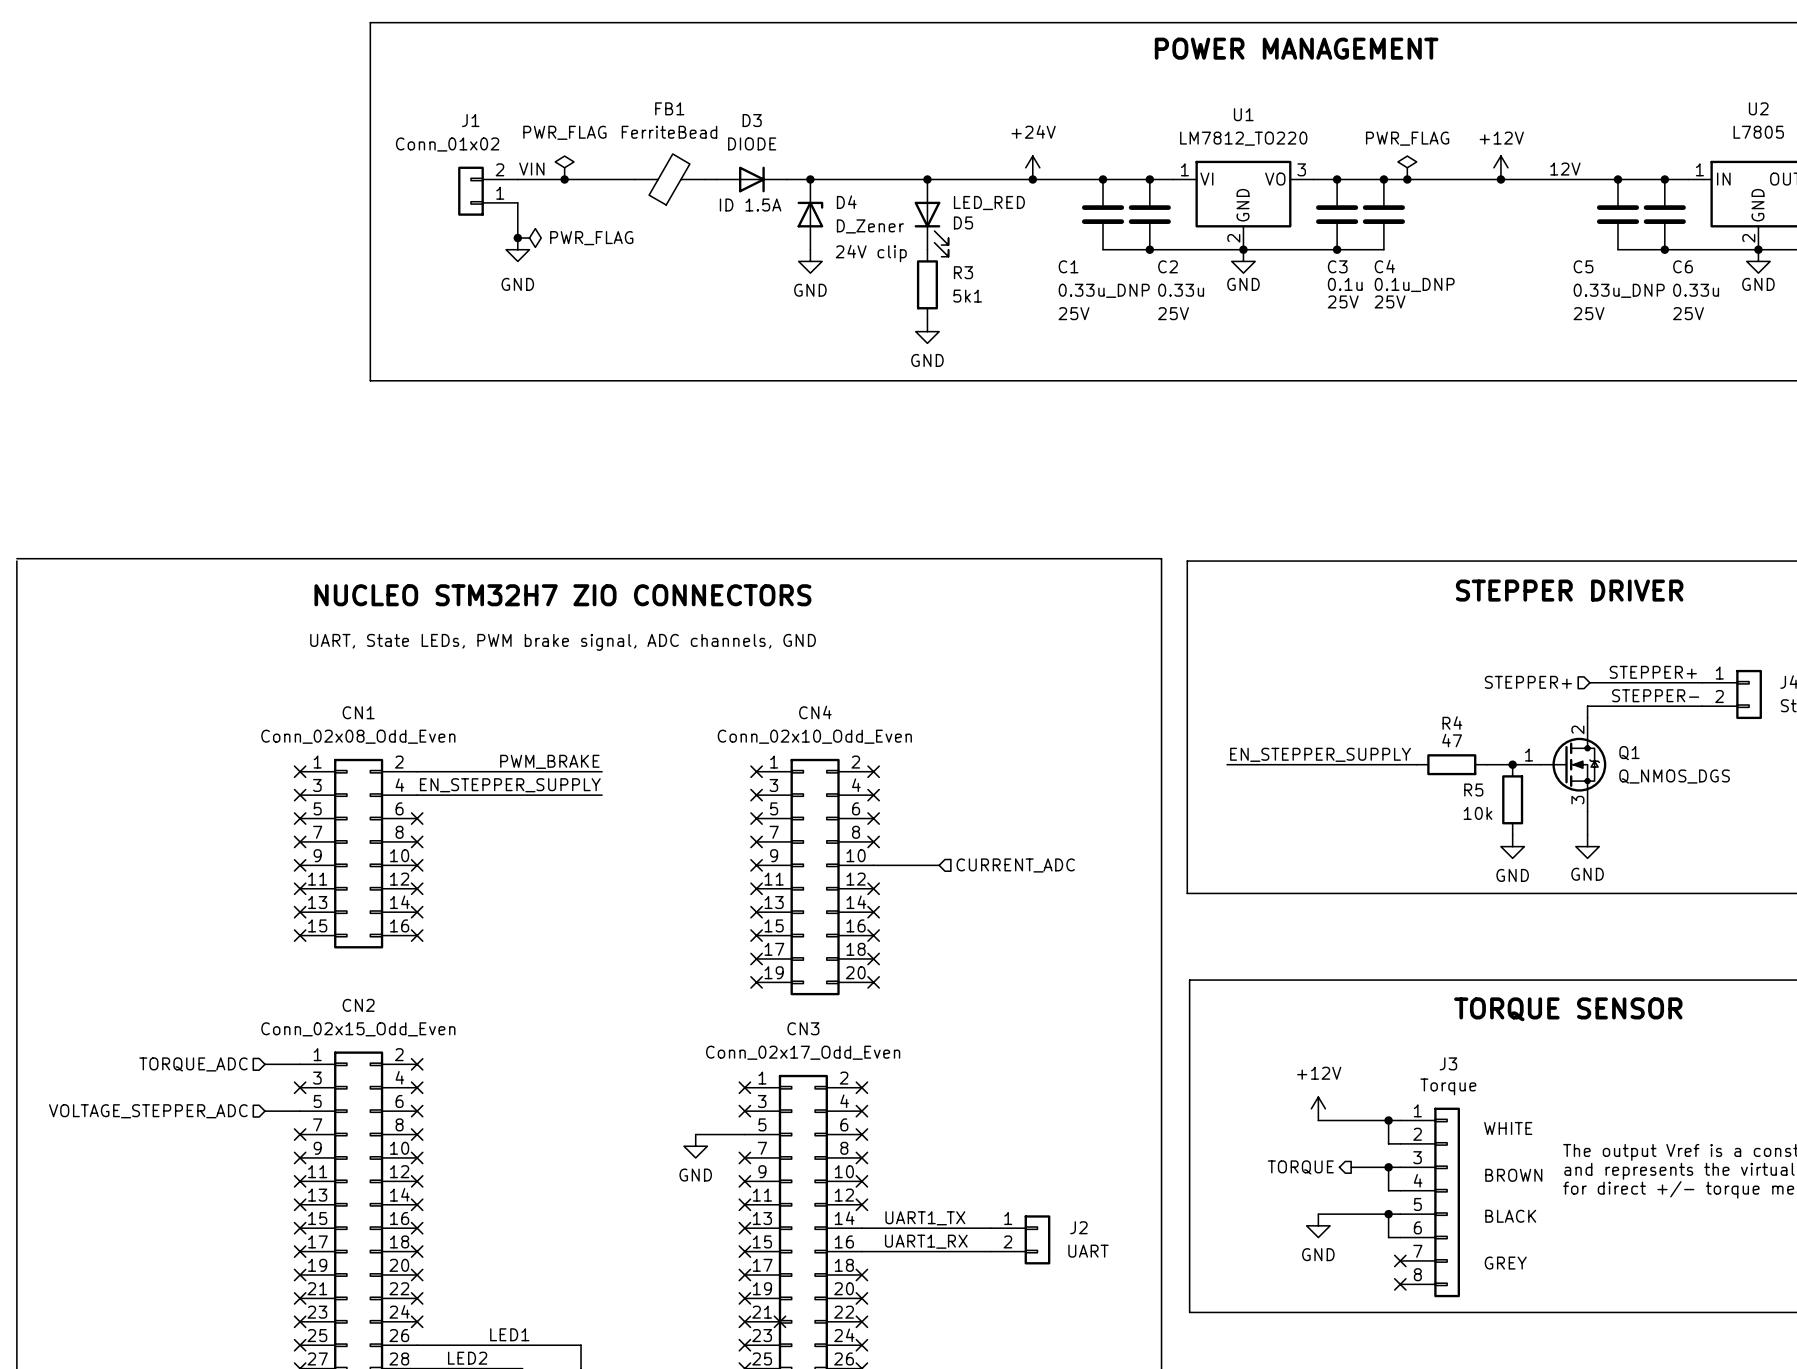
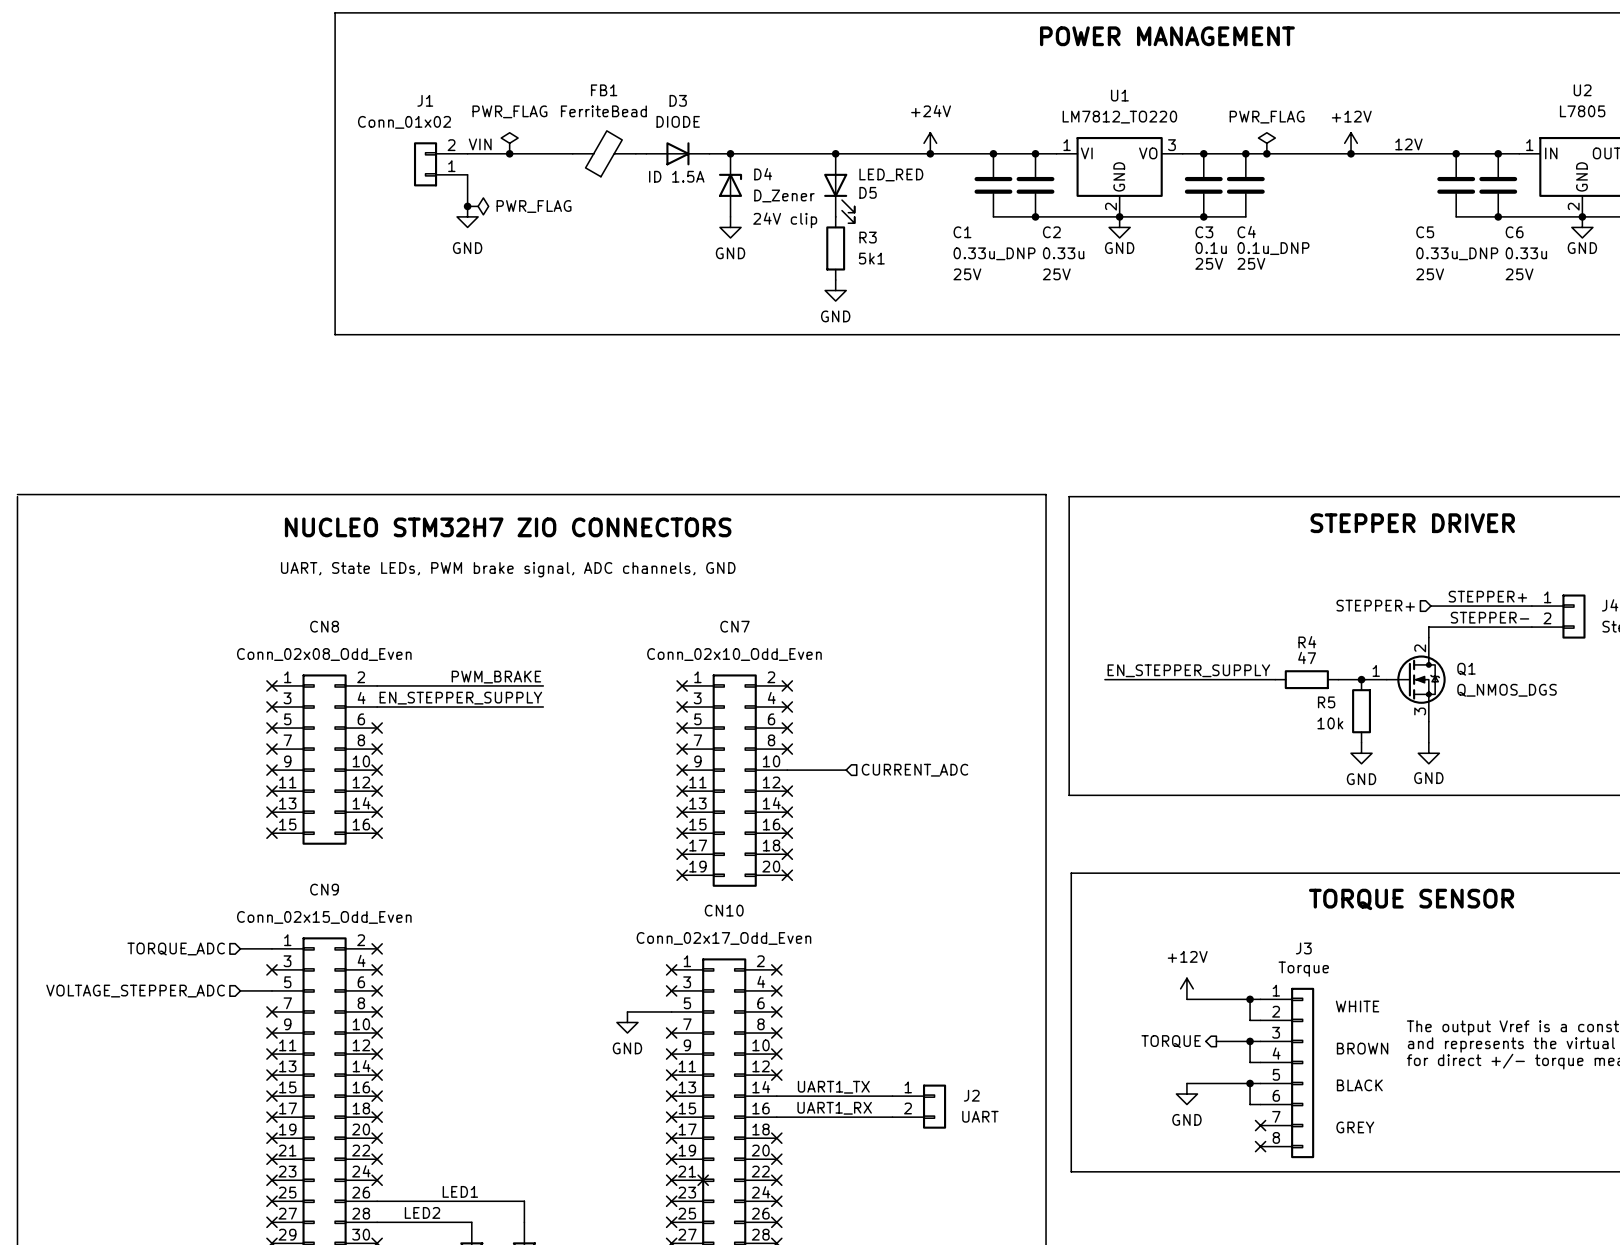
CN1 name: CN1 (358, 712) -> CN8 (324, 626)
CN4 name: CN4 (815, 712) -> CN7 (734, 626)
CN2 name: CN2 (358, 1005) -> CN9 (324, 889)
CN3 name: CN3 (803, 1028) -> CN10 (724, 910)

